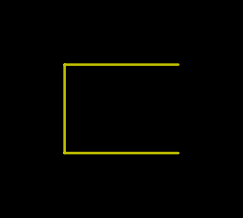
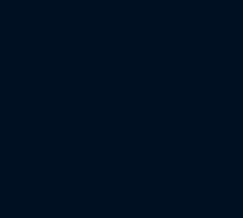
part: (121, 108) -> none

